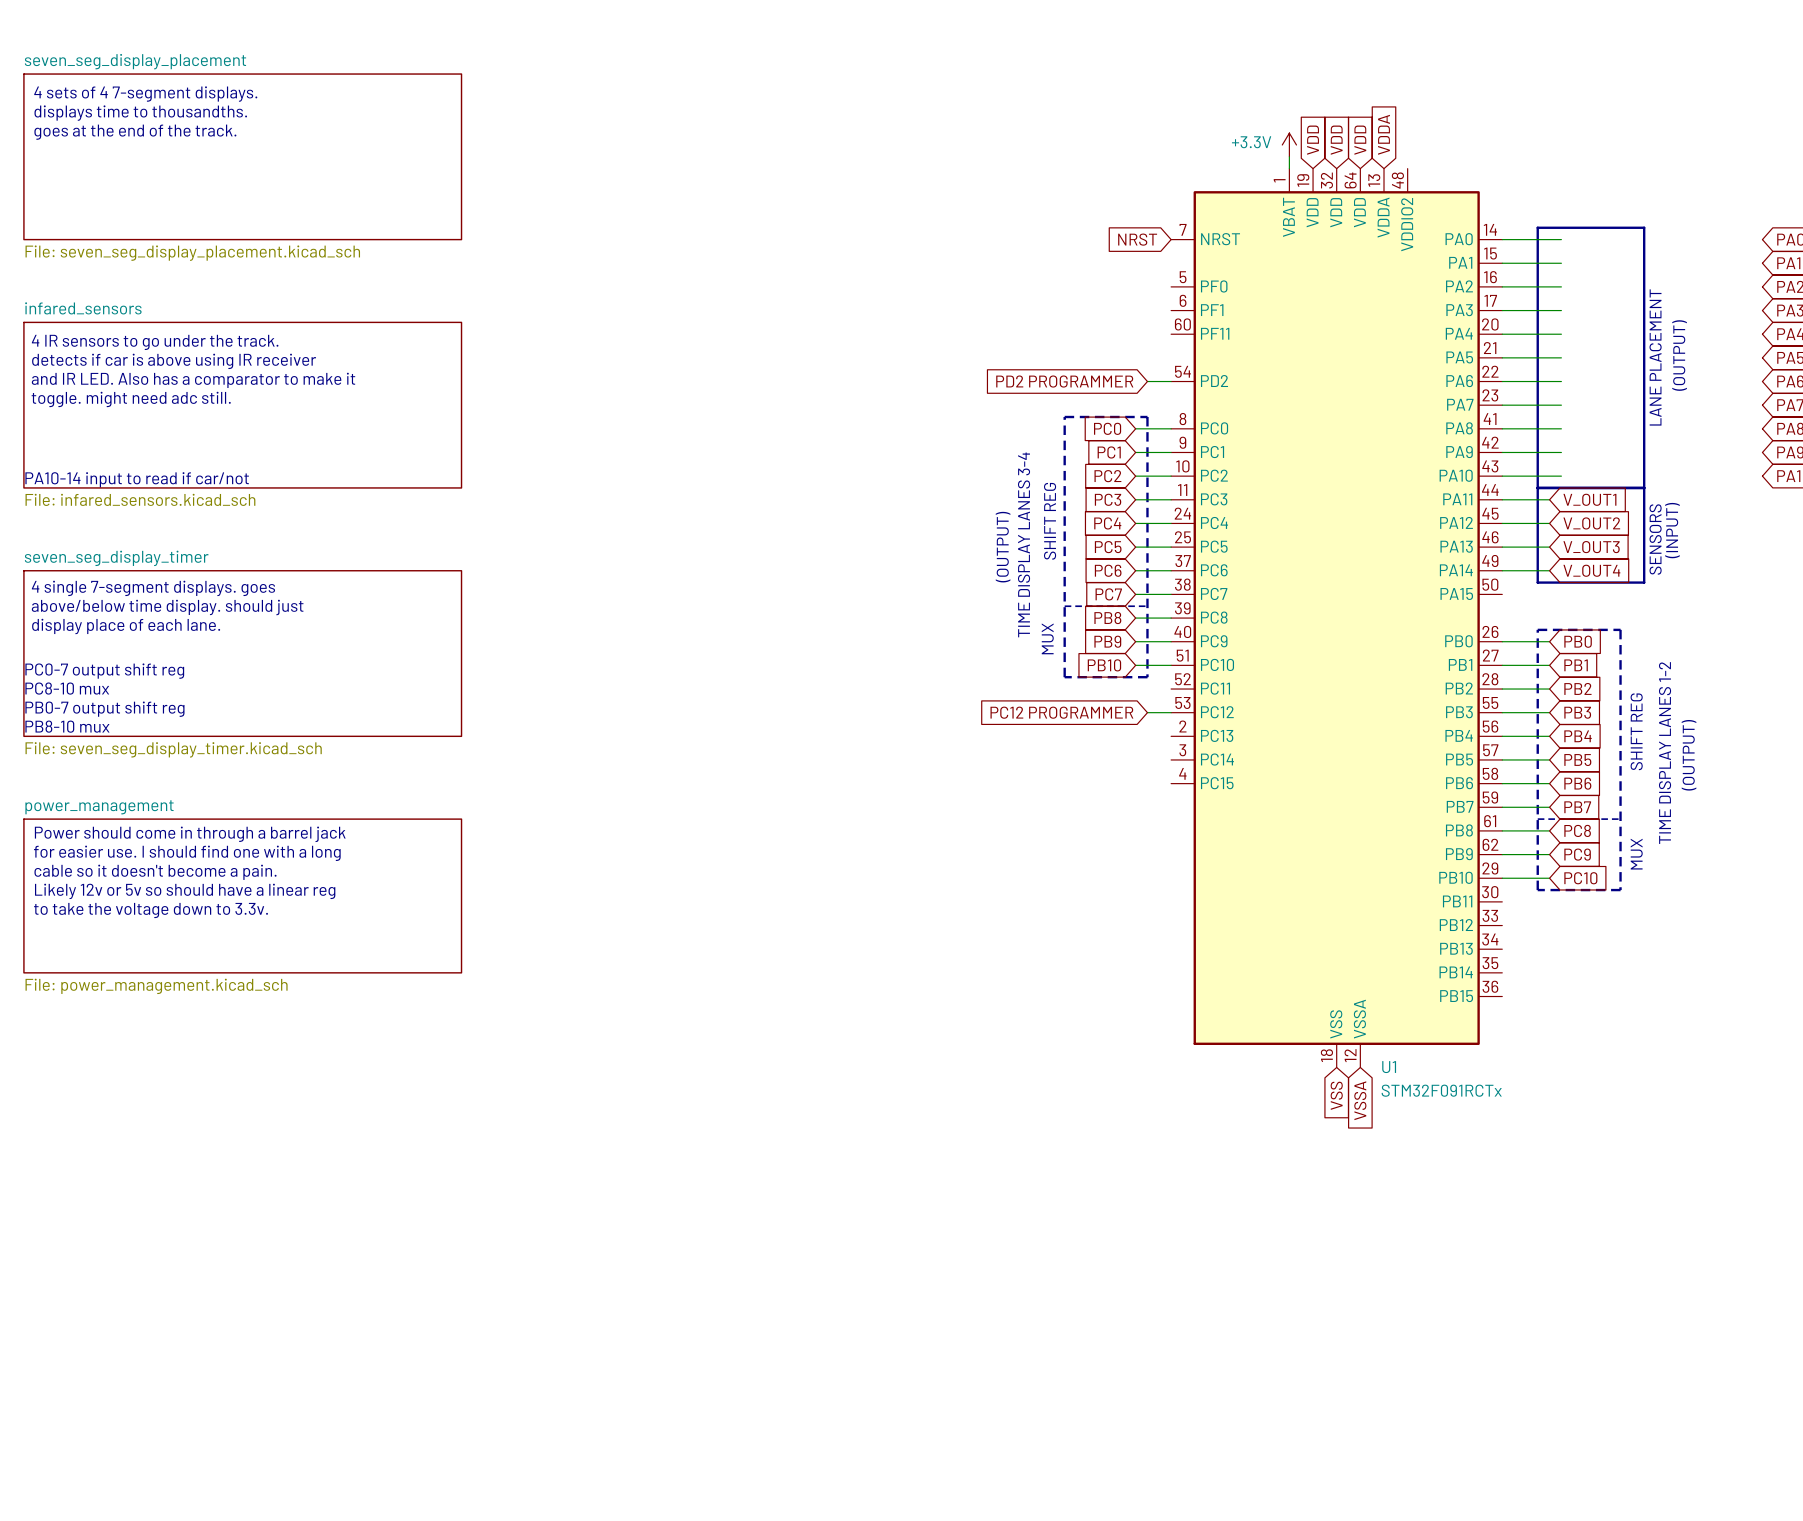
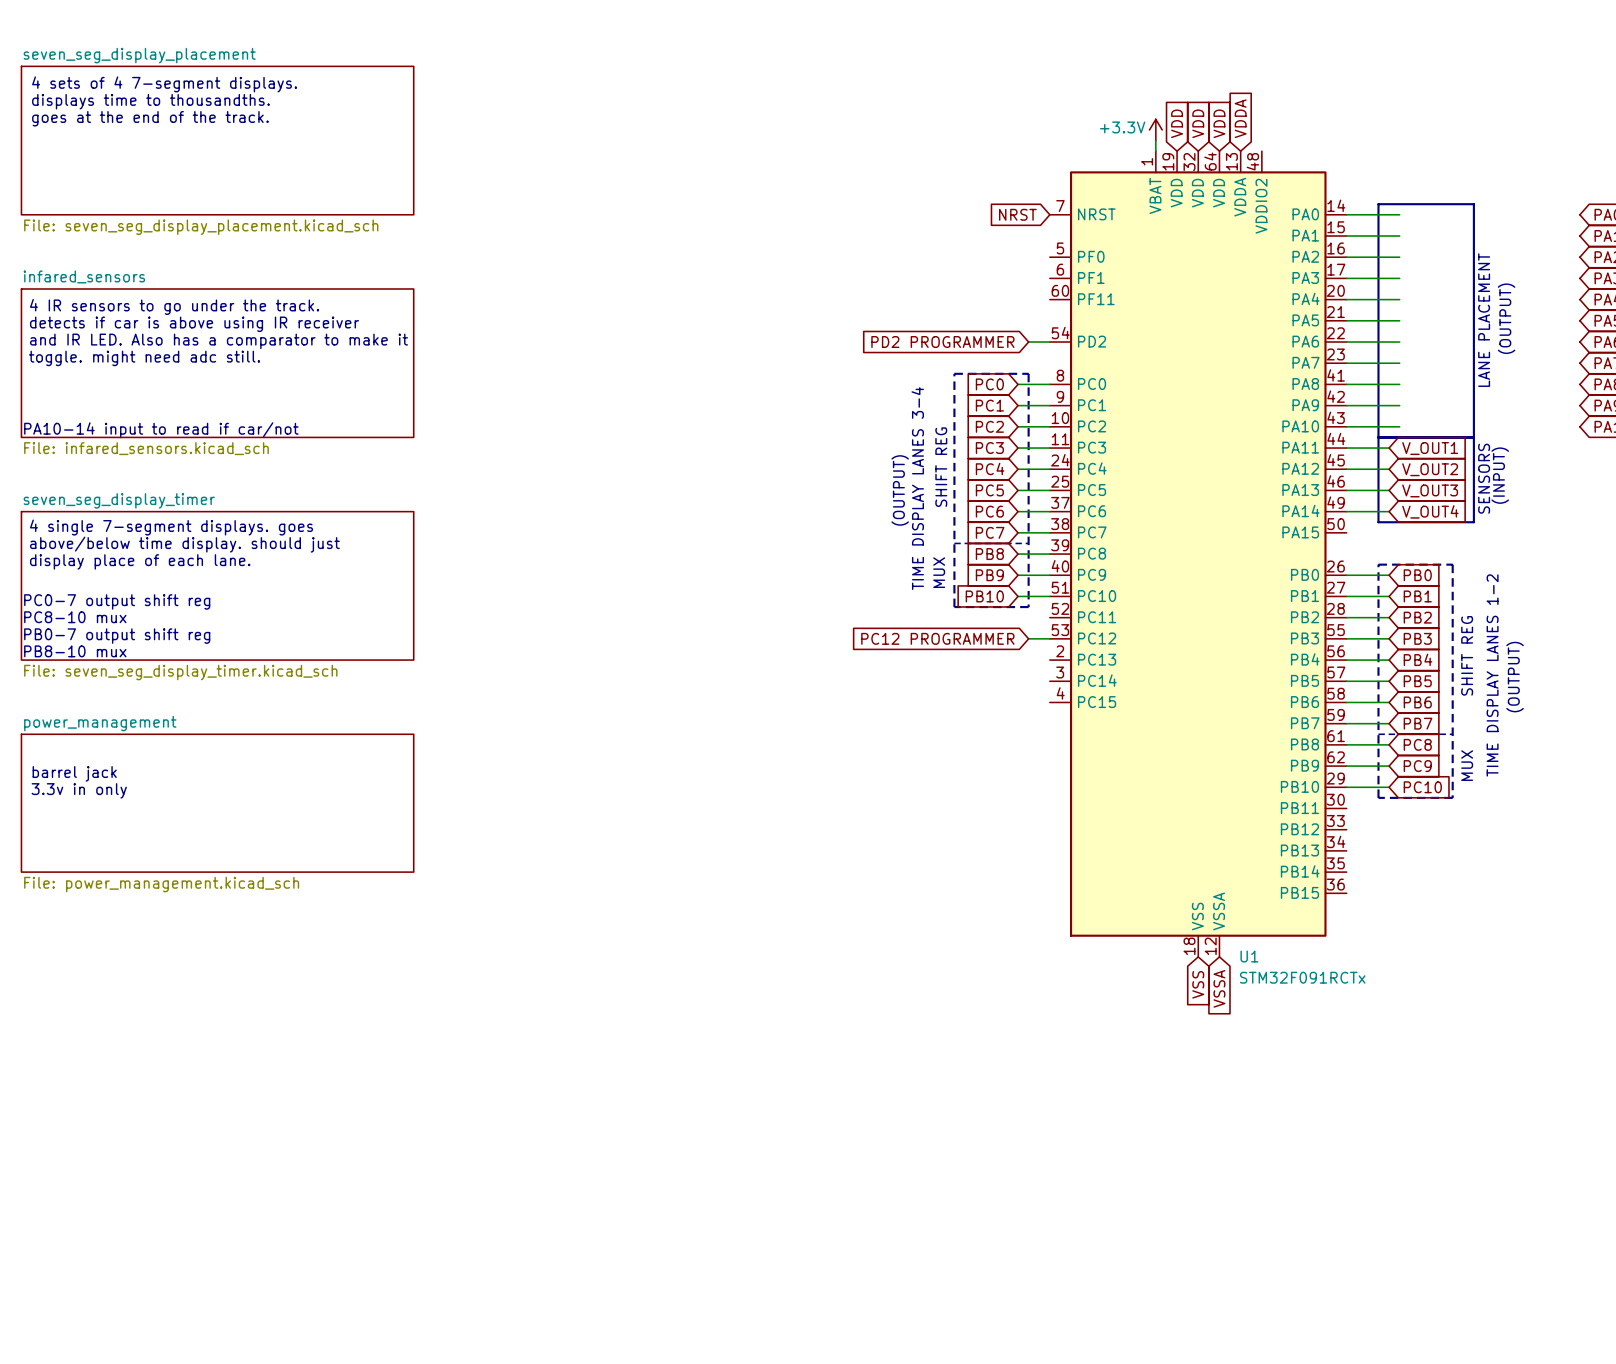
text: Power should come in through a barrel jack (190, 834) -> none
text: for easier use. I should find one with a long (187, 853) -> none
text: none -> barrel jack (74, 773)
text: cable so it doesn't become a pain. (155, 872) -> none
text: none -> 3.3v in only (79, 790)
text: Likely 12v or 5v so should have a linear reg (185, 891) -> none
text: to take the voltage down to 3.3v. (150, 910) -> none

